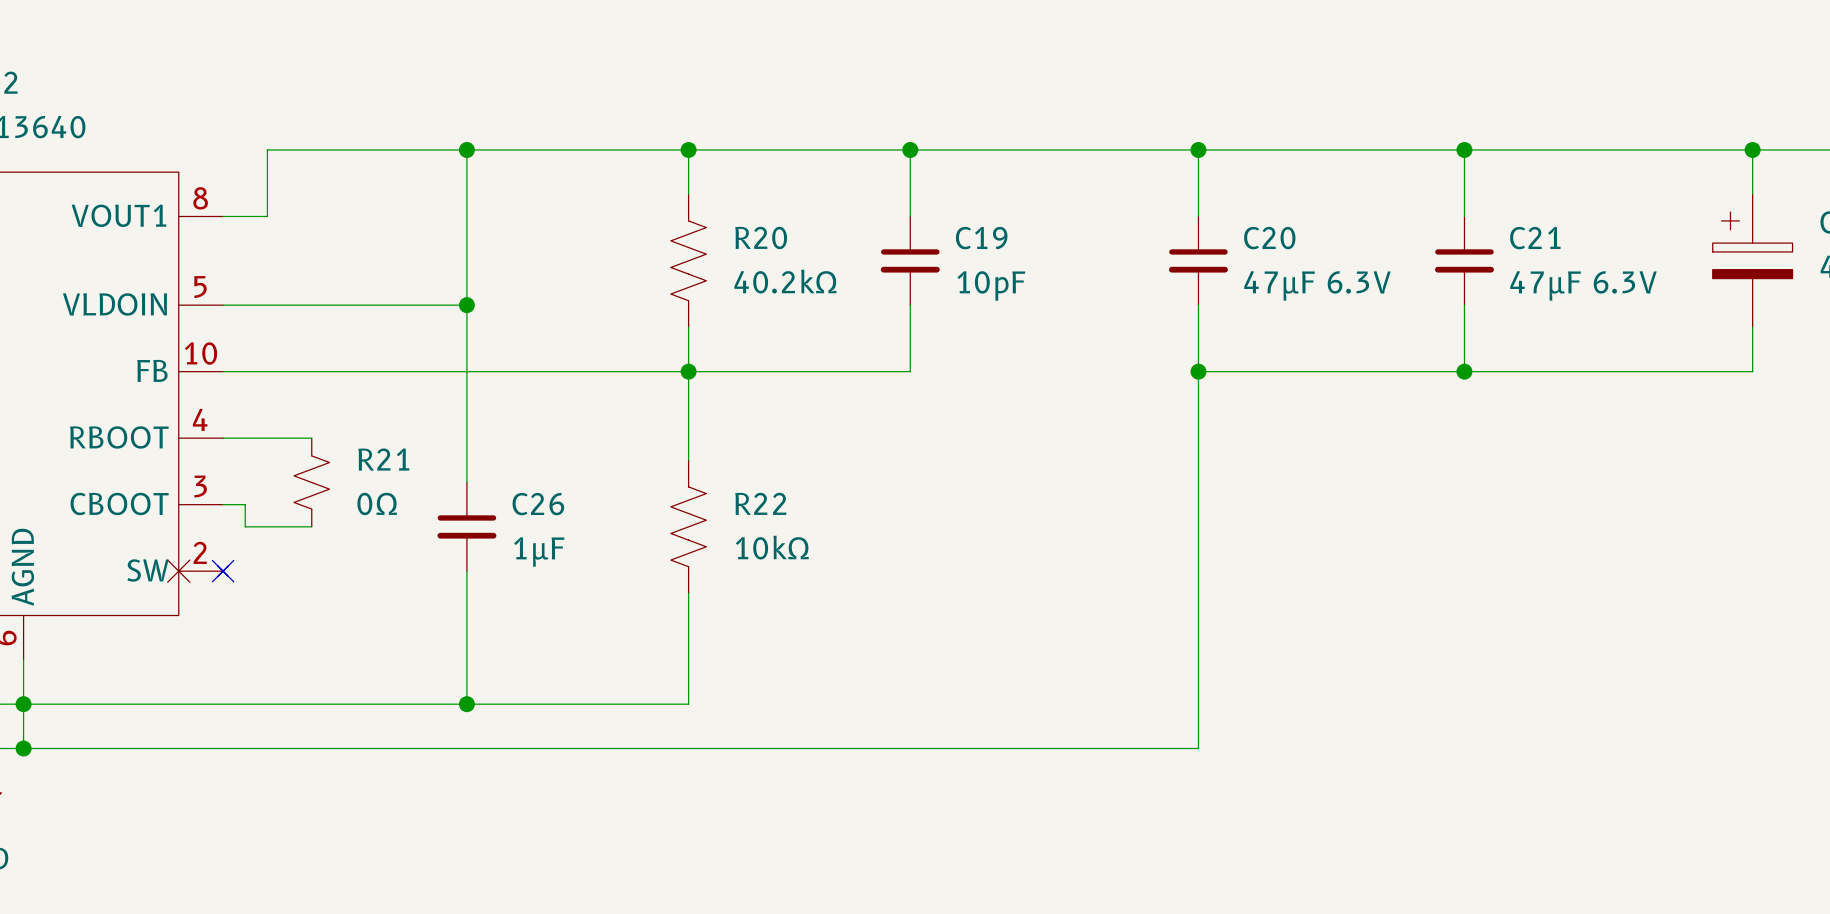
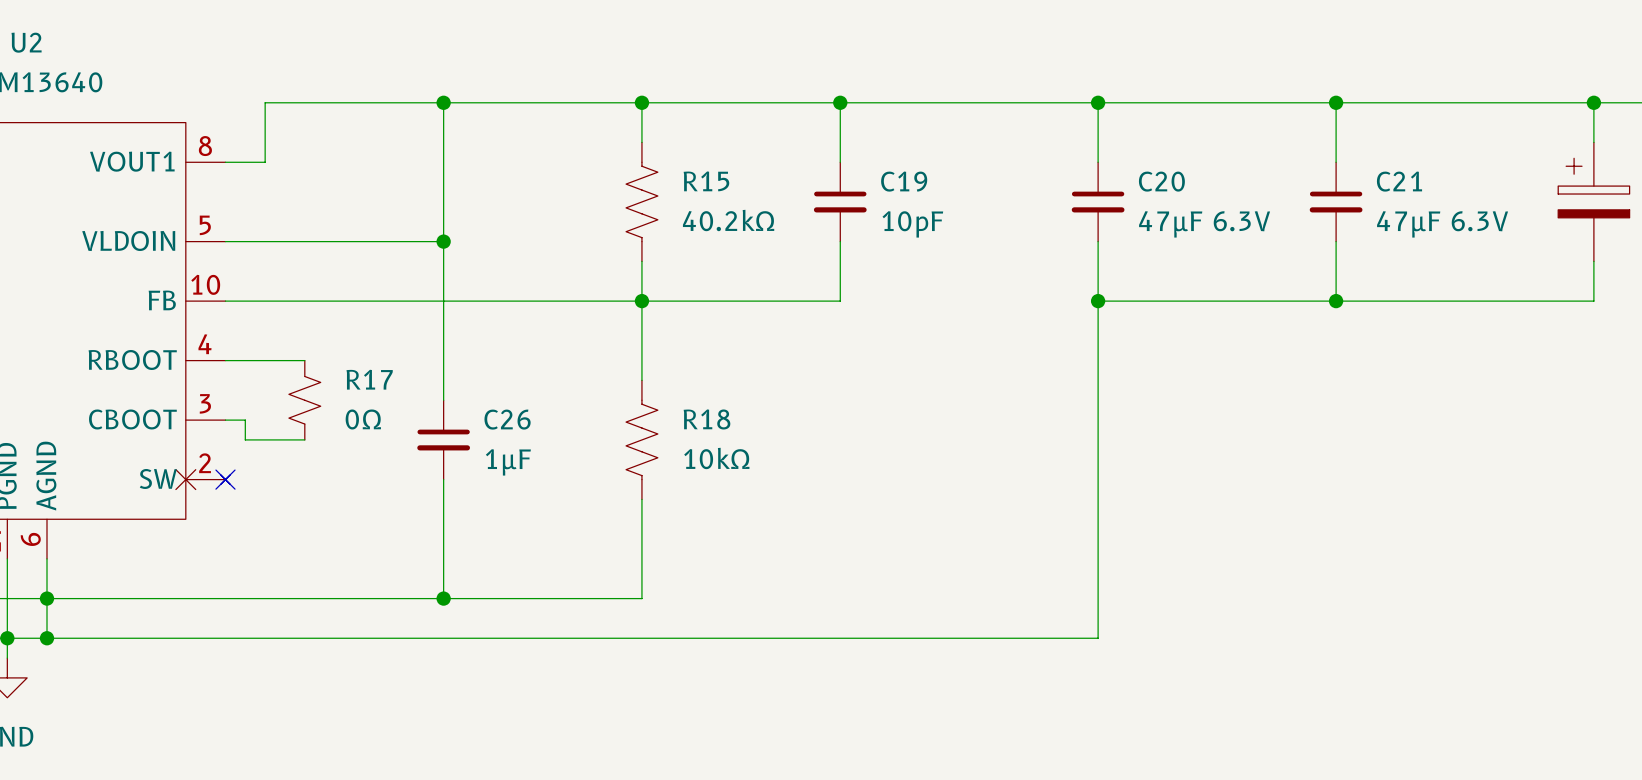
R20 name: R20 (761, 237) -> R15 (706, 181)
R21 name: R21 (383, 459) -> R17 (369, 379)
R22 name: R22 (760, 503) -> R18 (706, 419)

